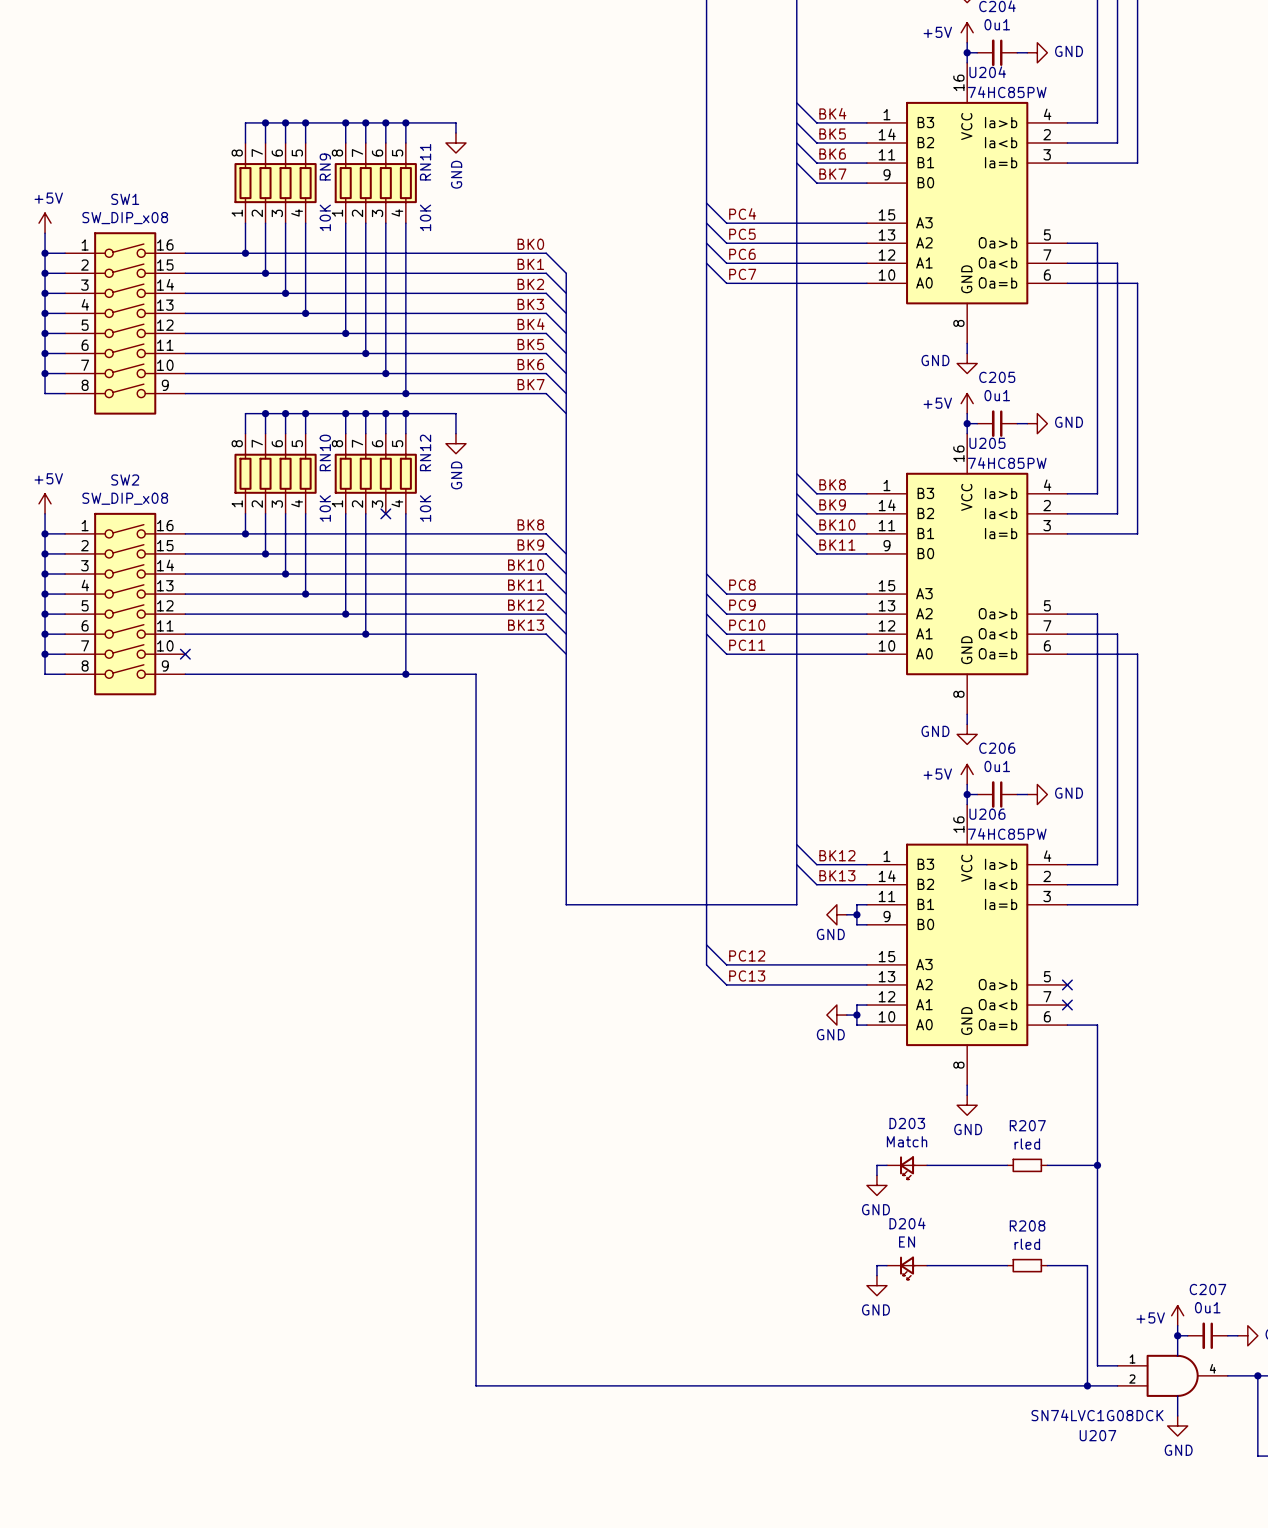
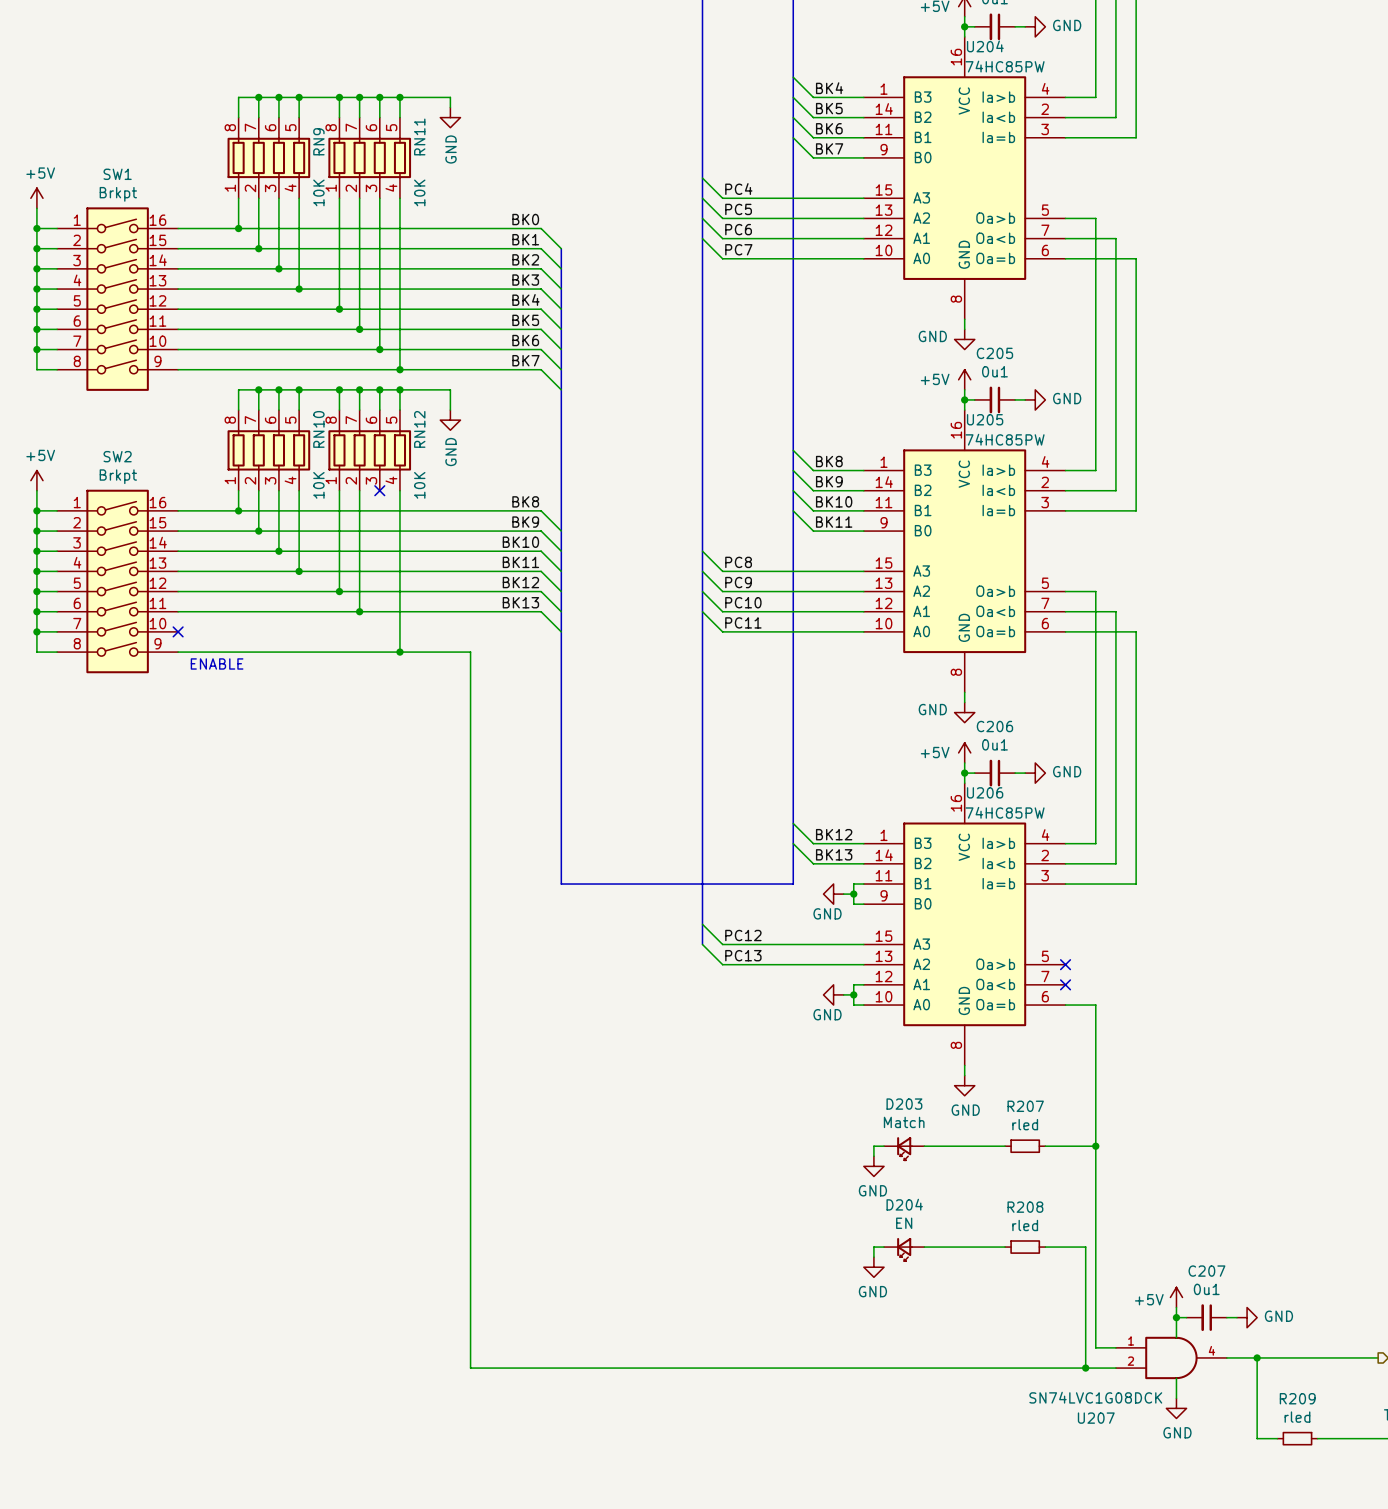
SW1 value: SW_DIP_x08 (125, 218) -> Brkpt (118, 194)
SW2 value: SW_DIP_x08 (125, 498) -> Brkpt (118, 476)
text: none -> ENABLE (217, 663)

